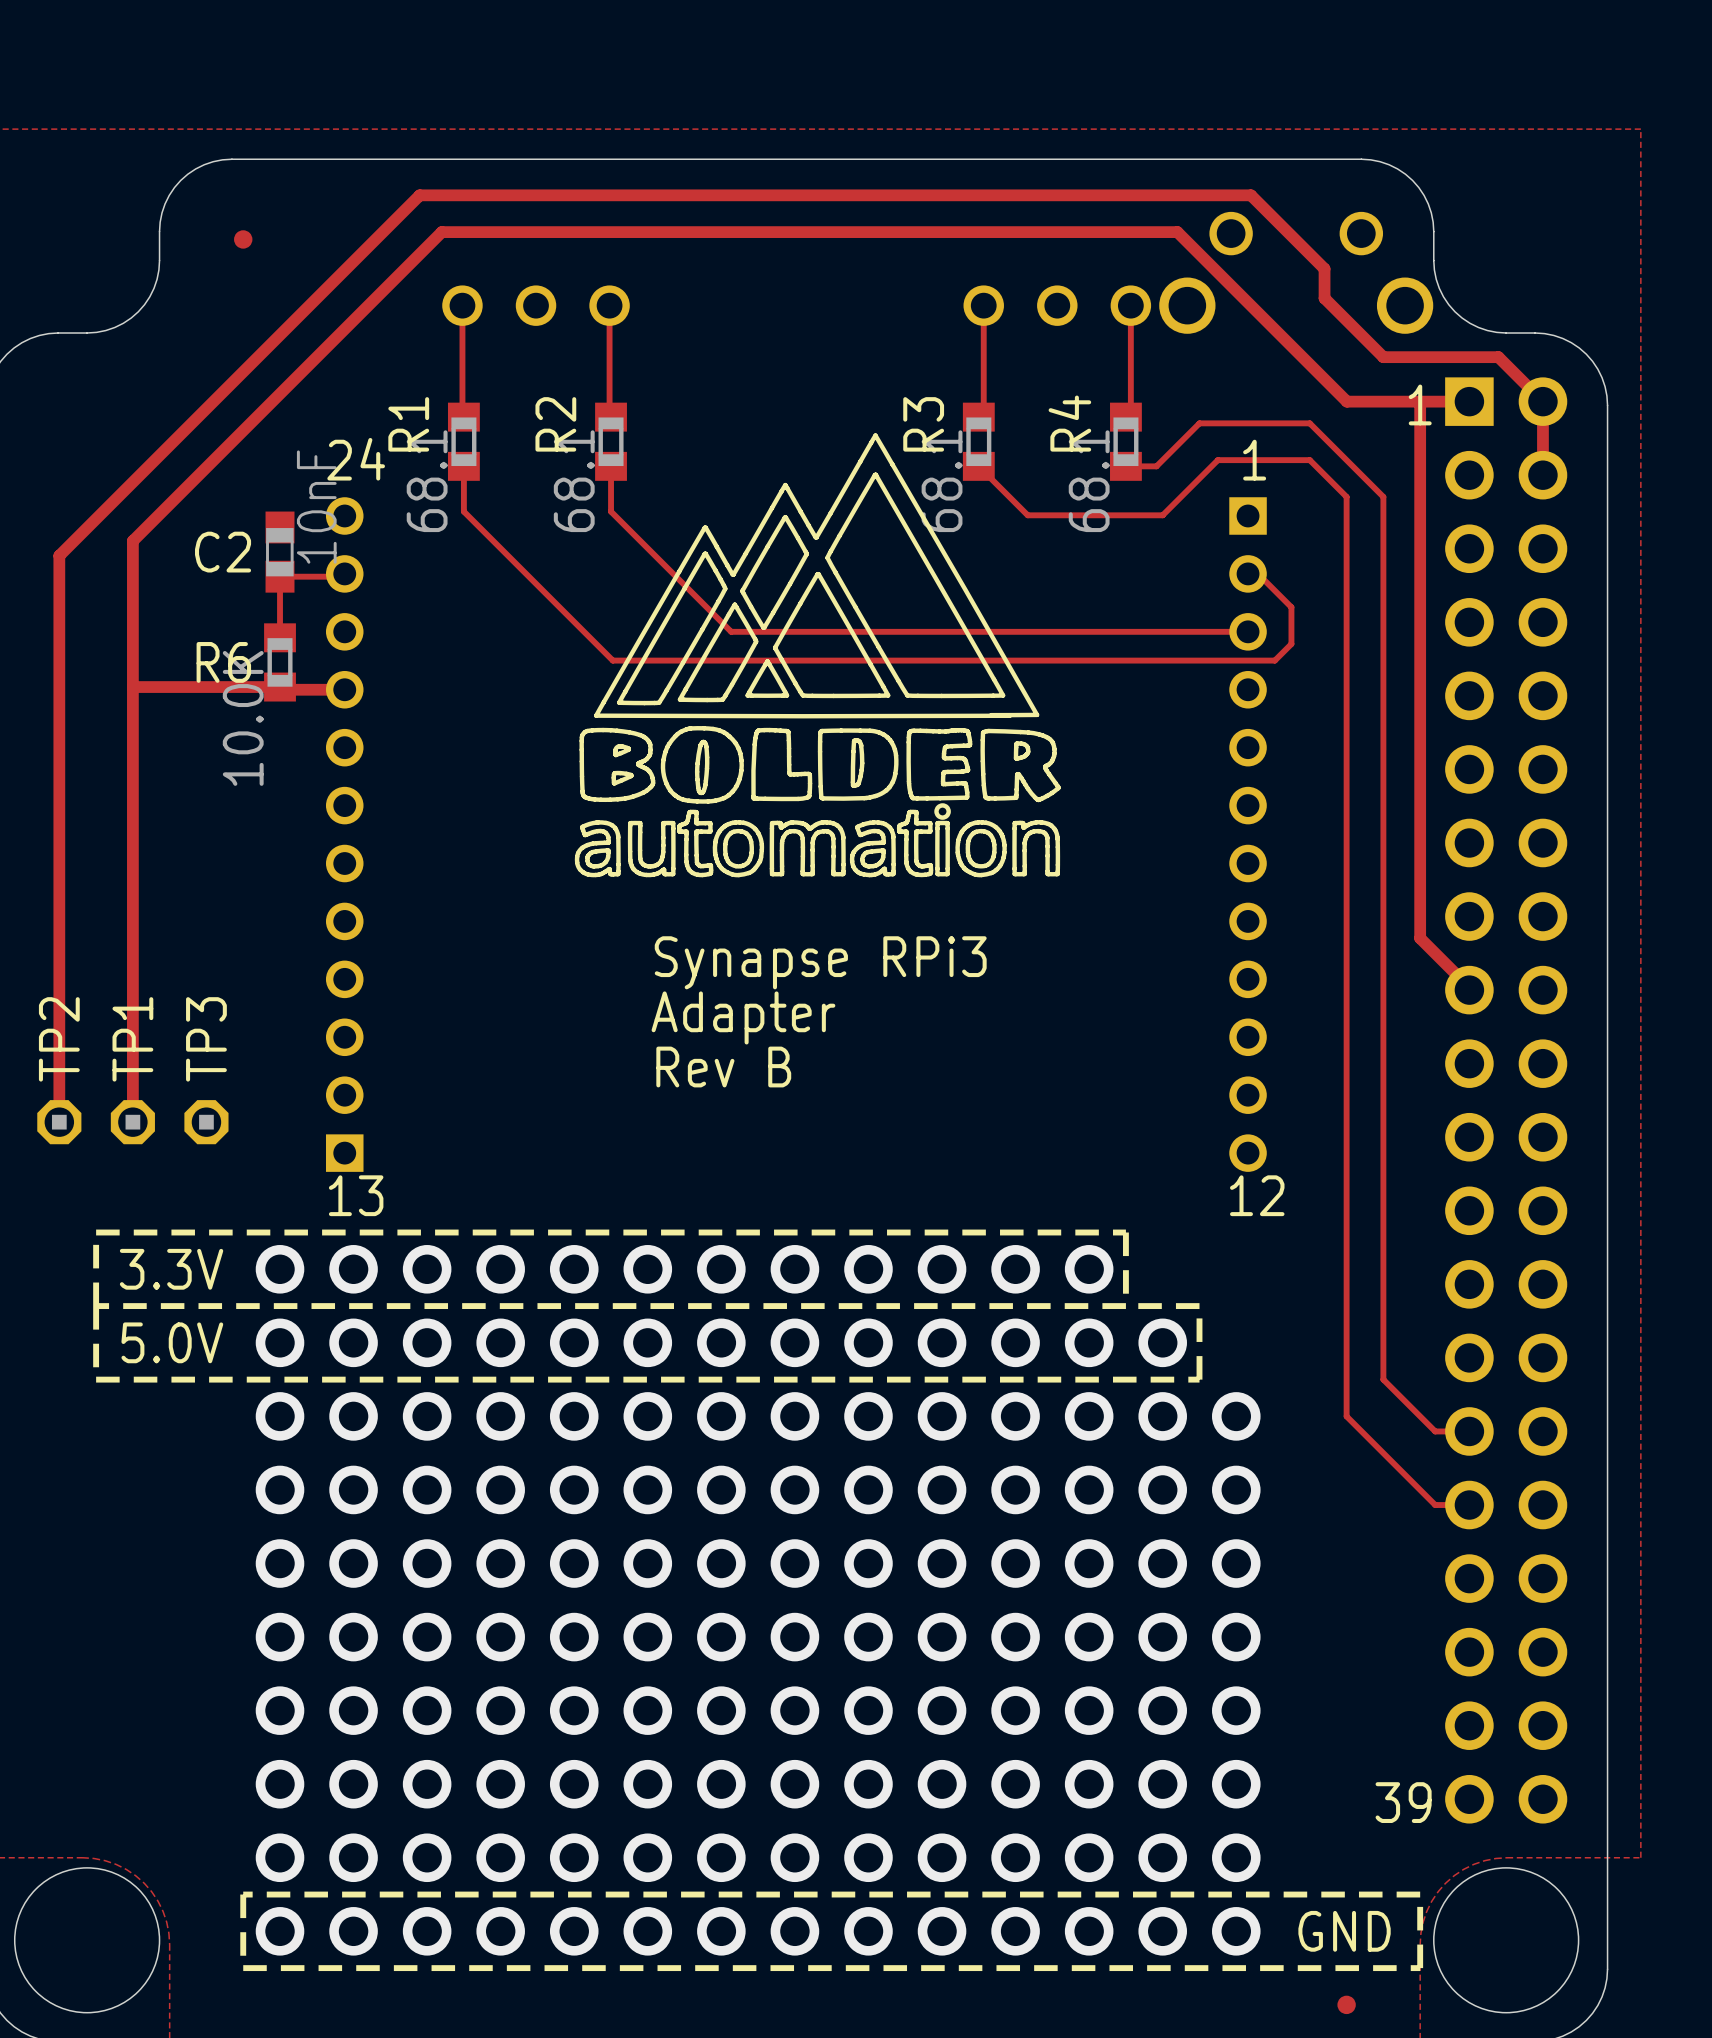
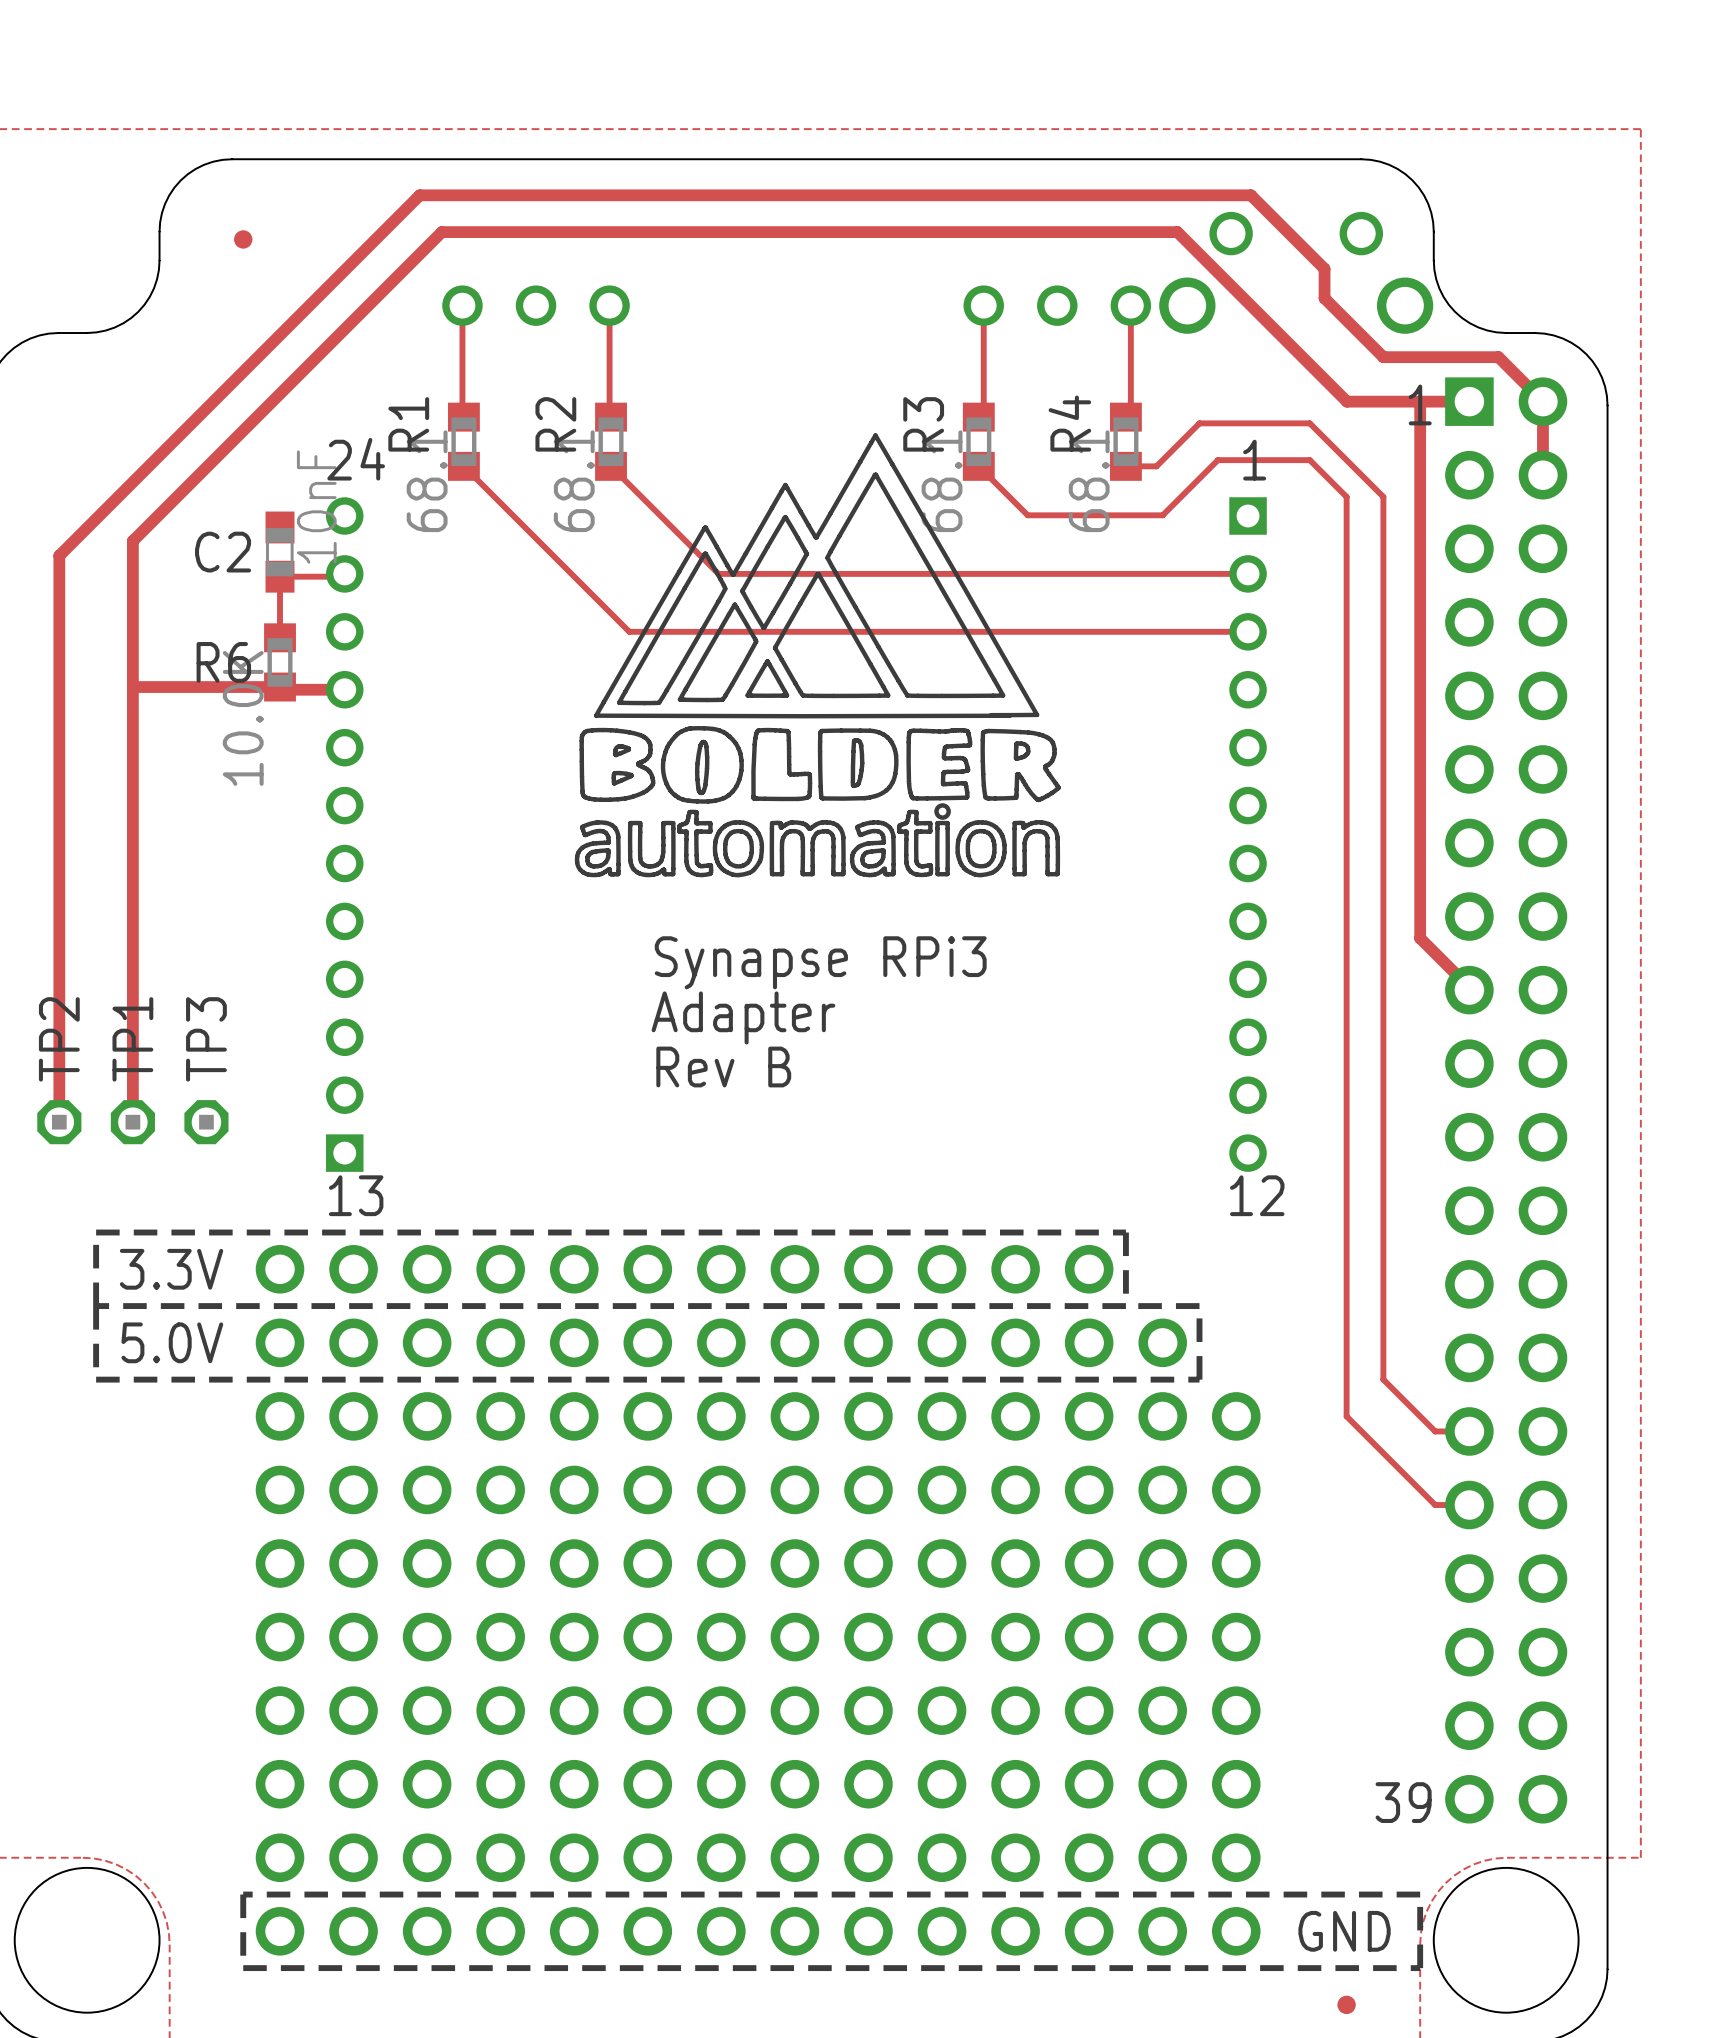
track: (463, 466) (463, 511) (612, 660) (1274, 660) (1291, 644) (1291, 607) (1258, 573) (1248, 573) -> (611, 466) (718, 573) (1248, 573)
track: (611, 466) (611, 511) (731, 631) -> (463, 466) (629, 631) (731, 631)

